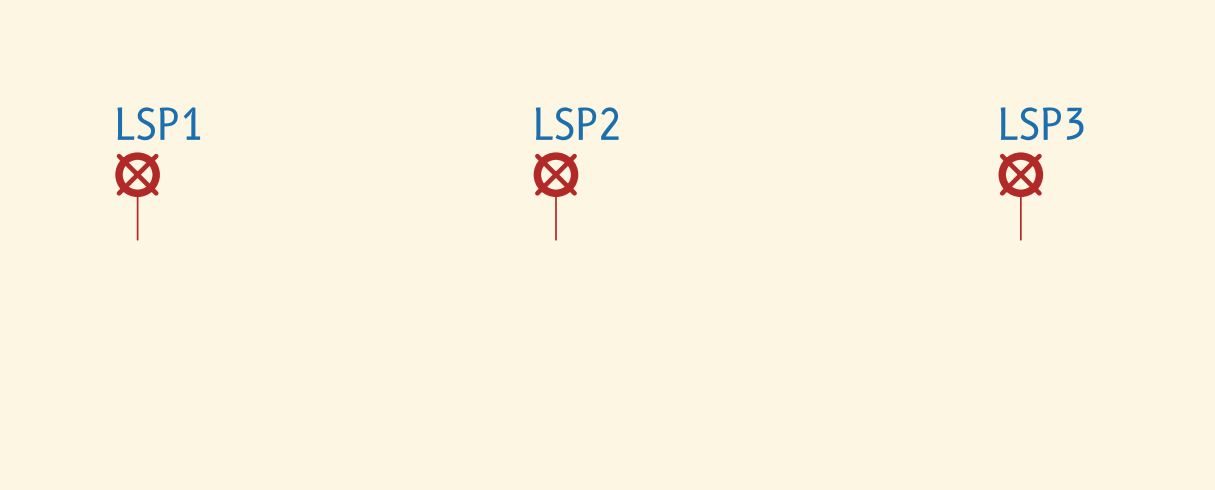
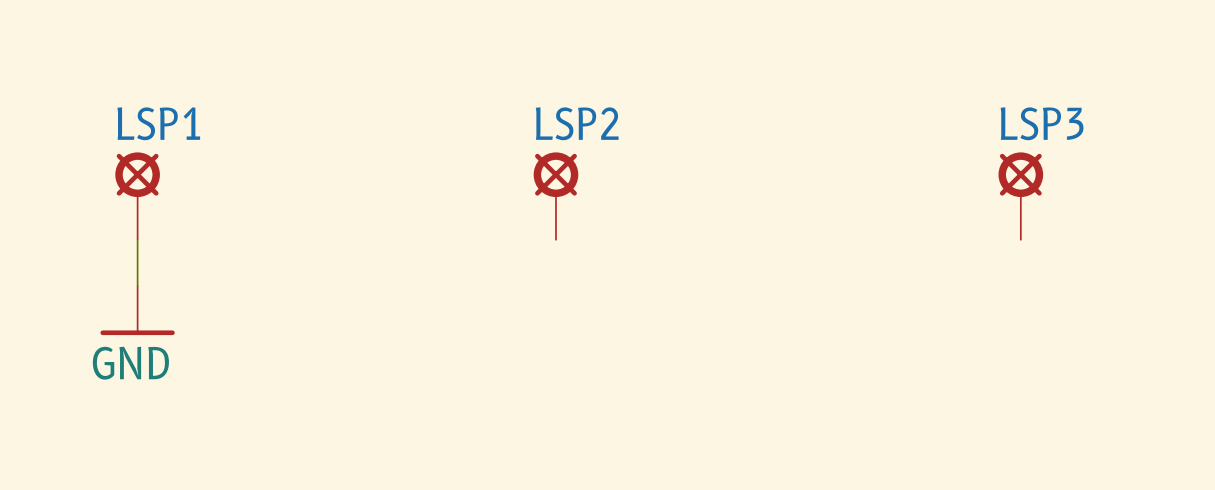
wire: none -> (137, 239) (137, 286)
power symbol: none -> GND (137, 310)

